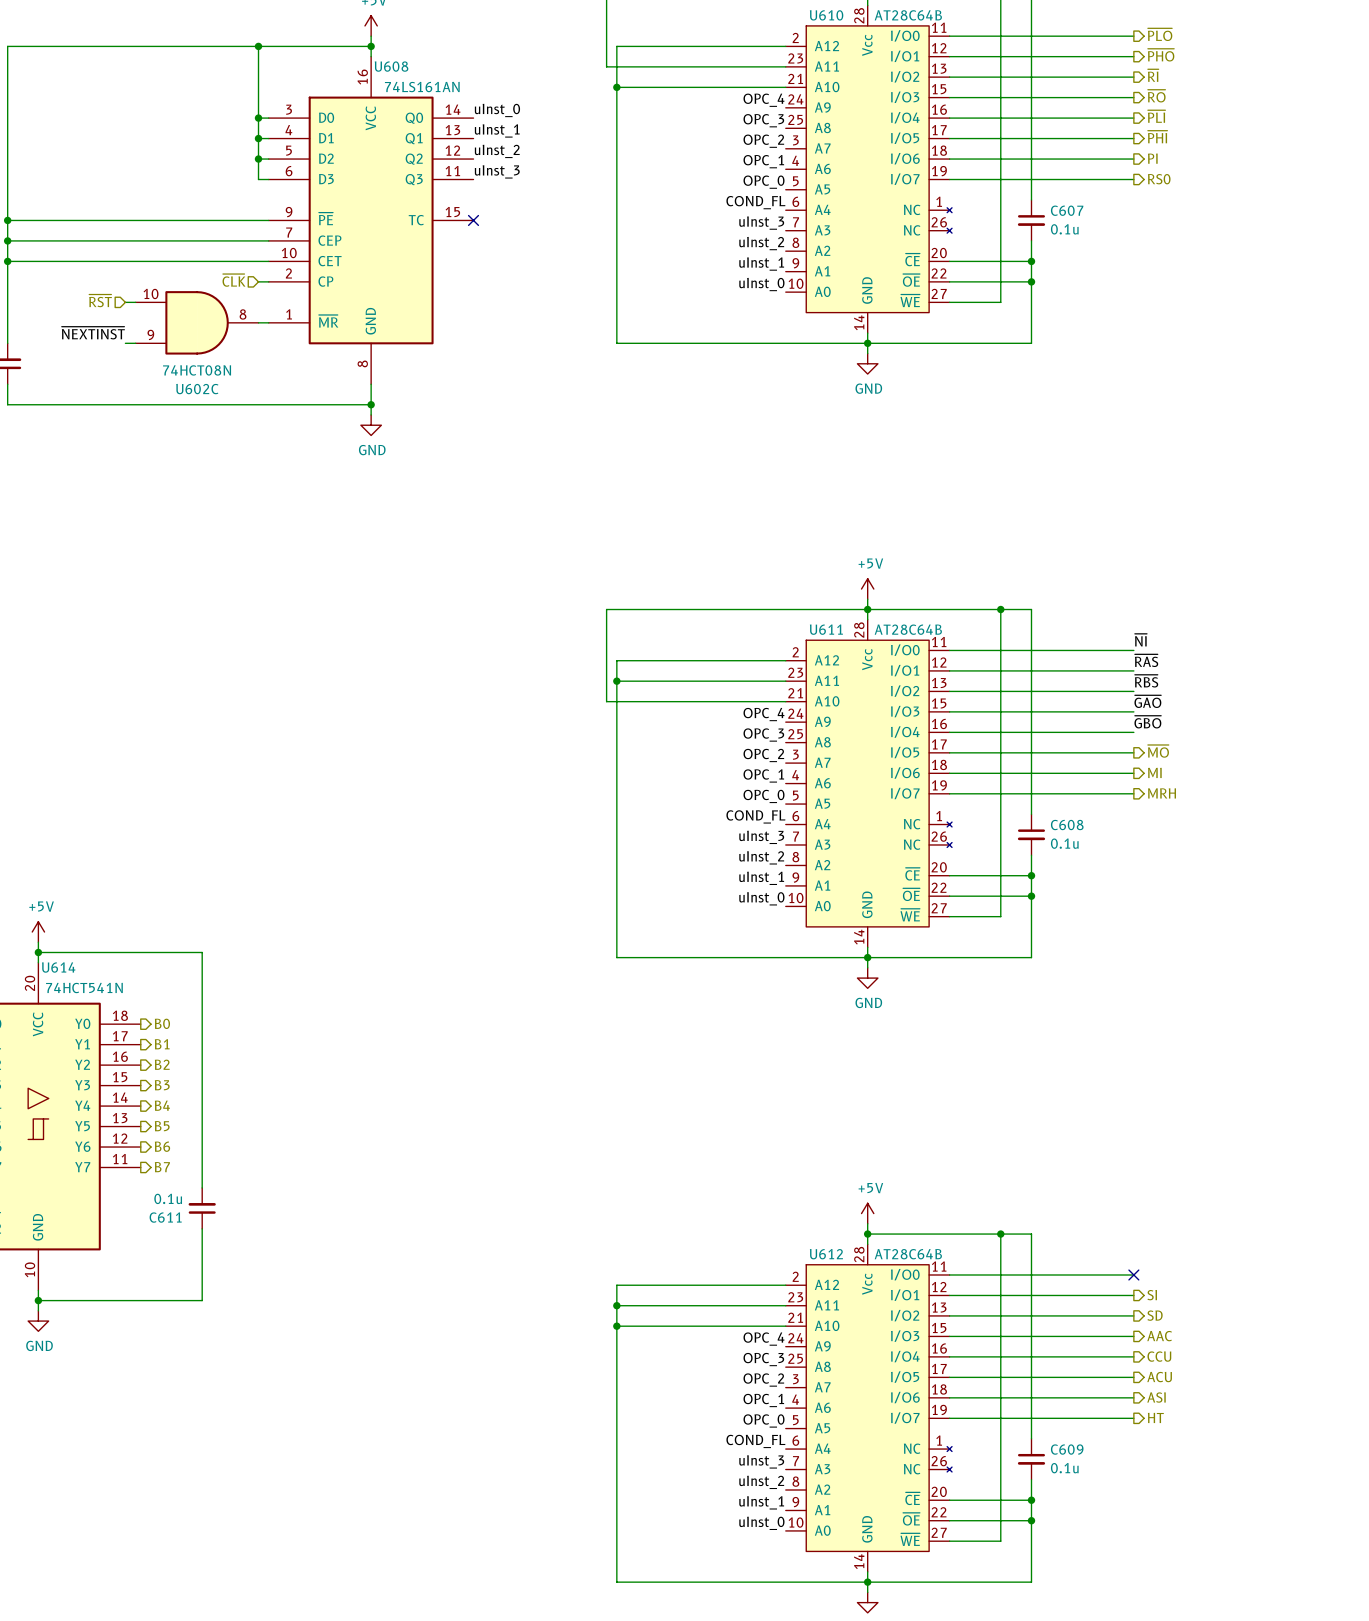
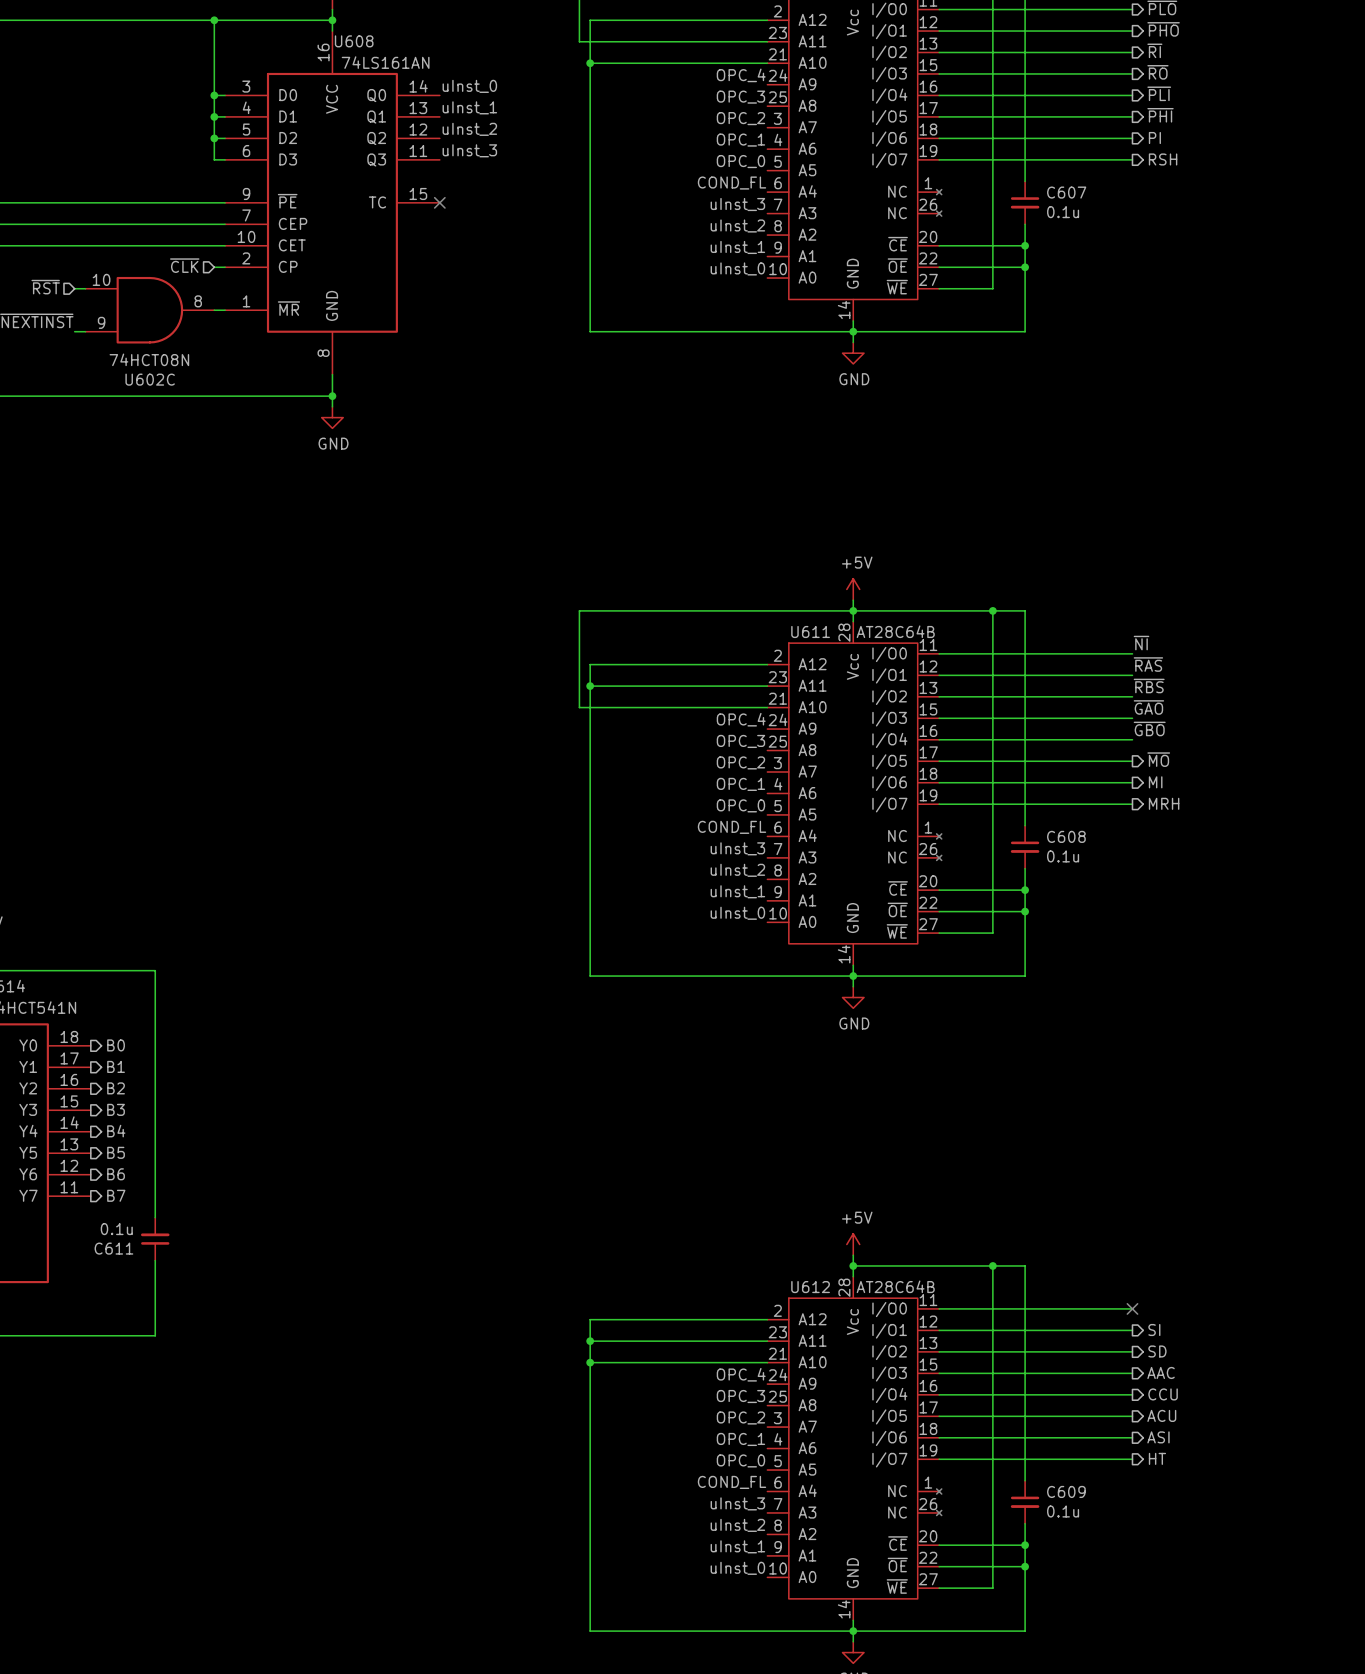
hierarchical label: RS0 (1159, 179) -> RSH (1163, 159)

